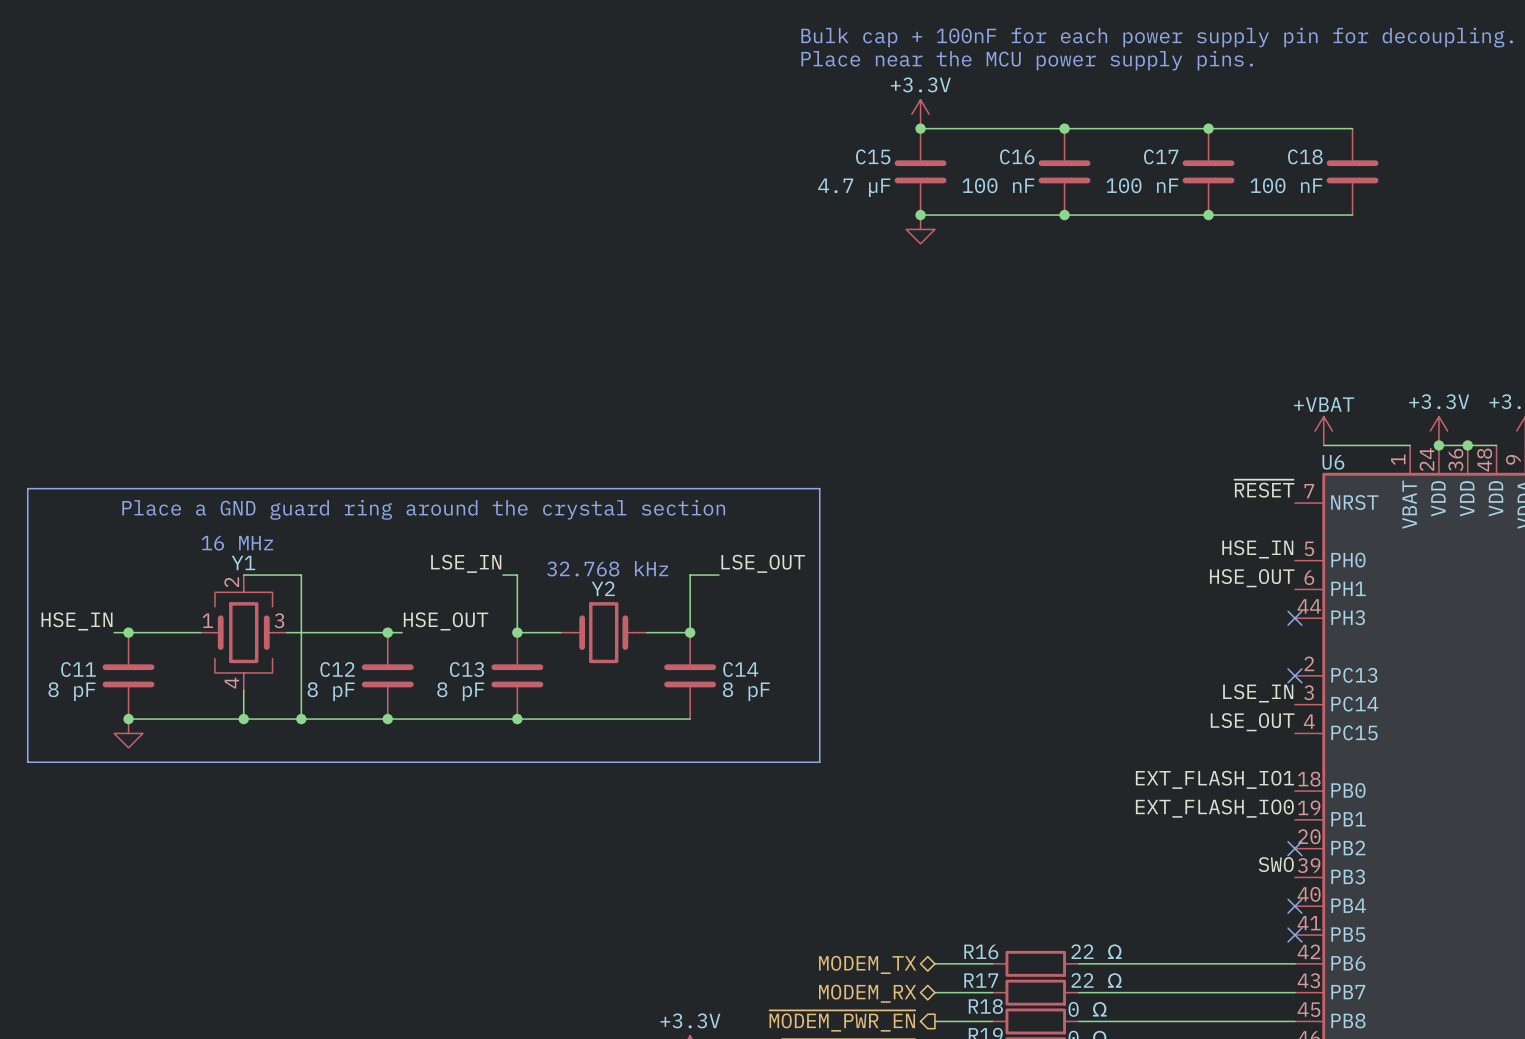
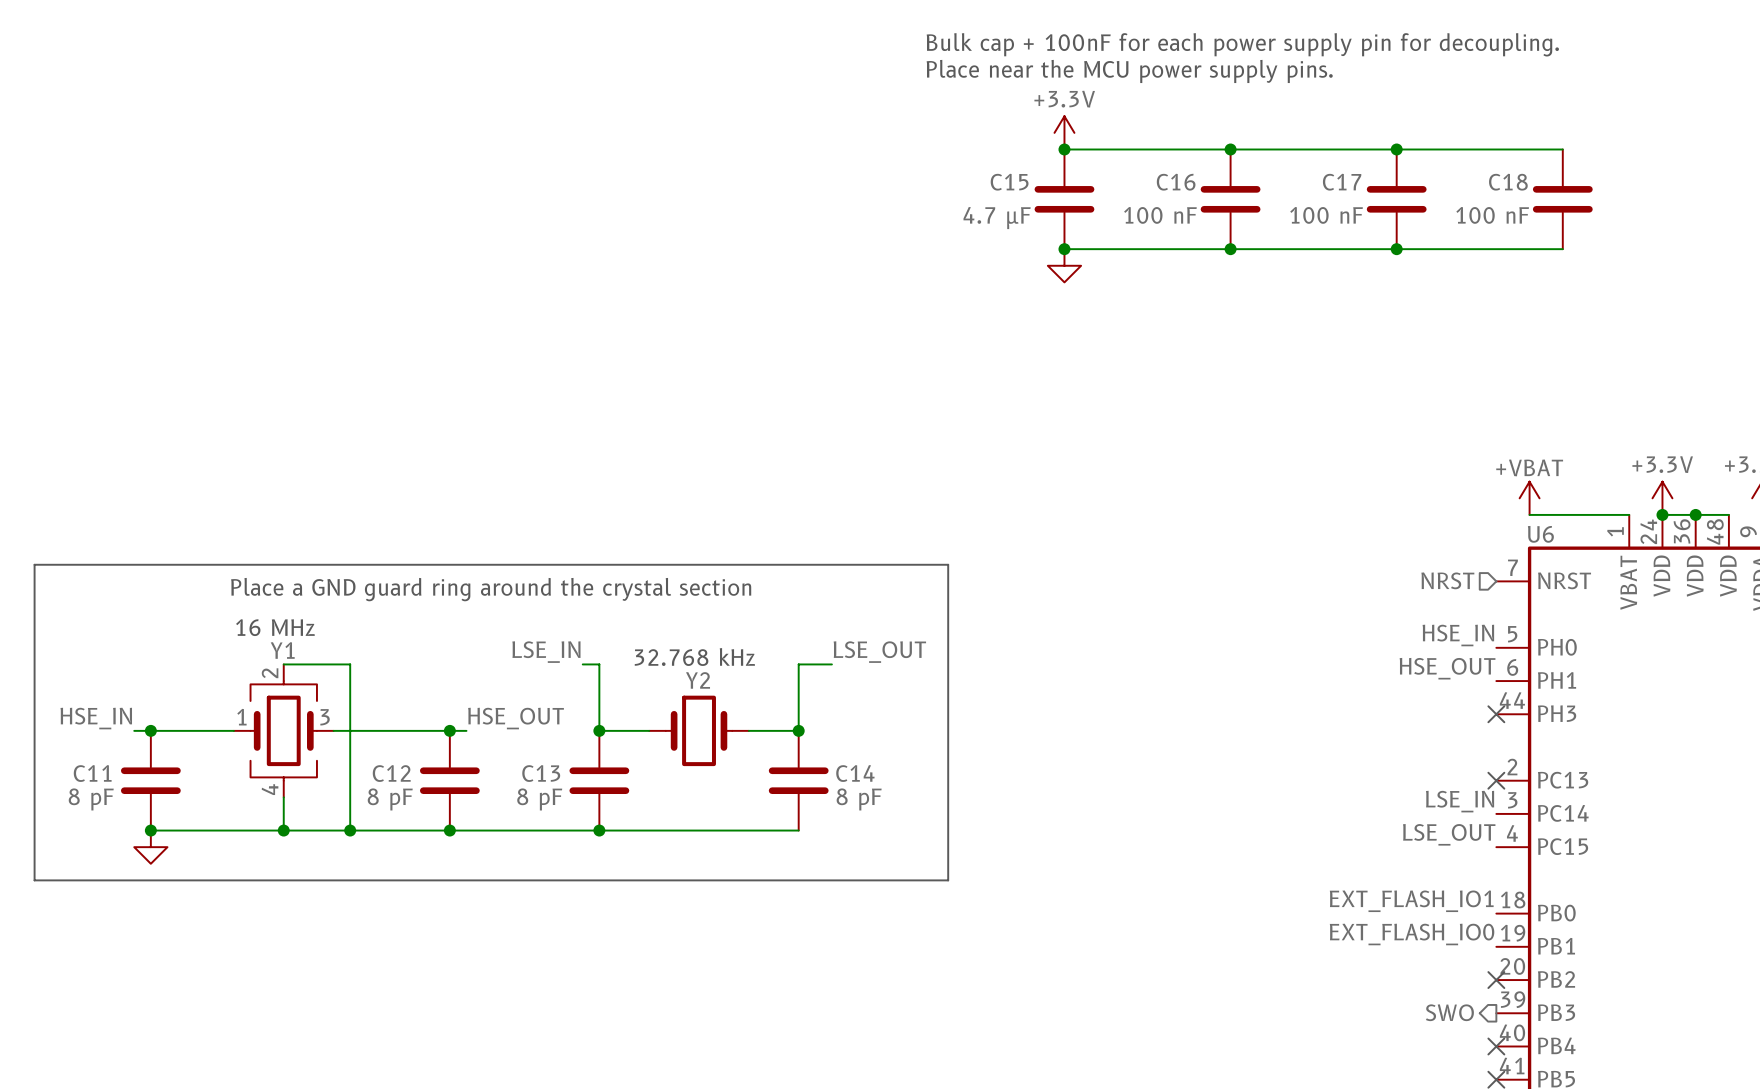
label: ~{RESET} (1264, 488) -> none
hierarchical label: none -> NRST (1447, 580)
label: SWO (1276, 864) -> none
hierarchical label: none -> SWO (1449, 1012)

